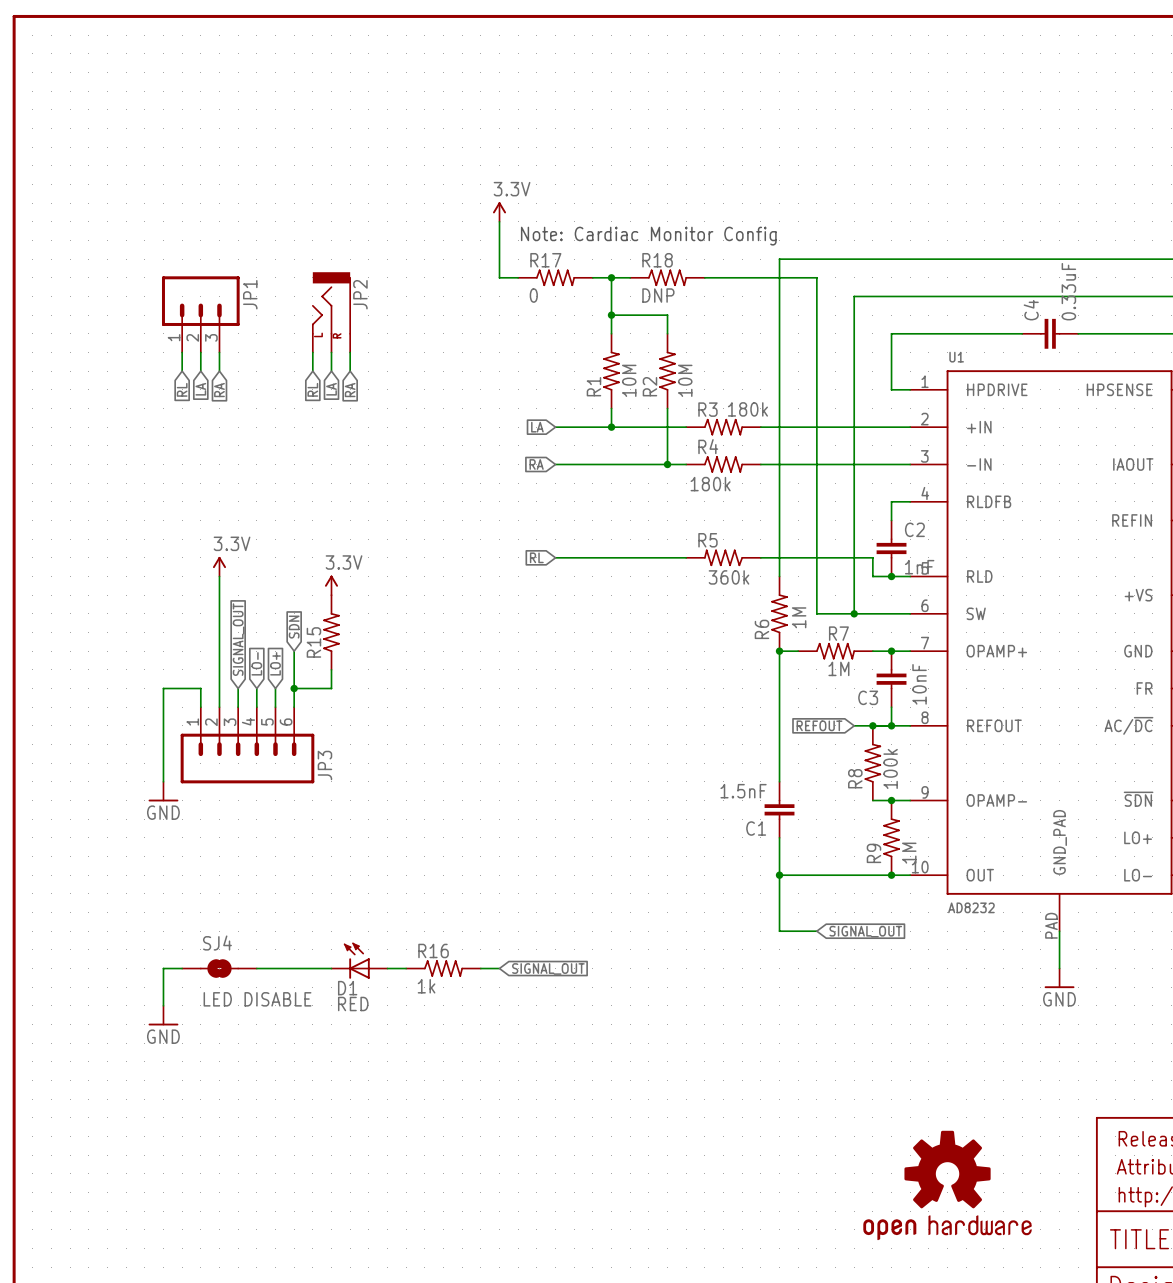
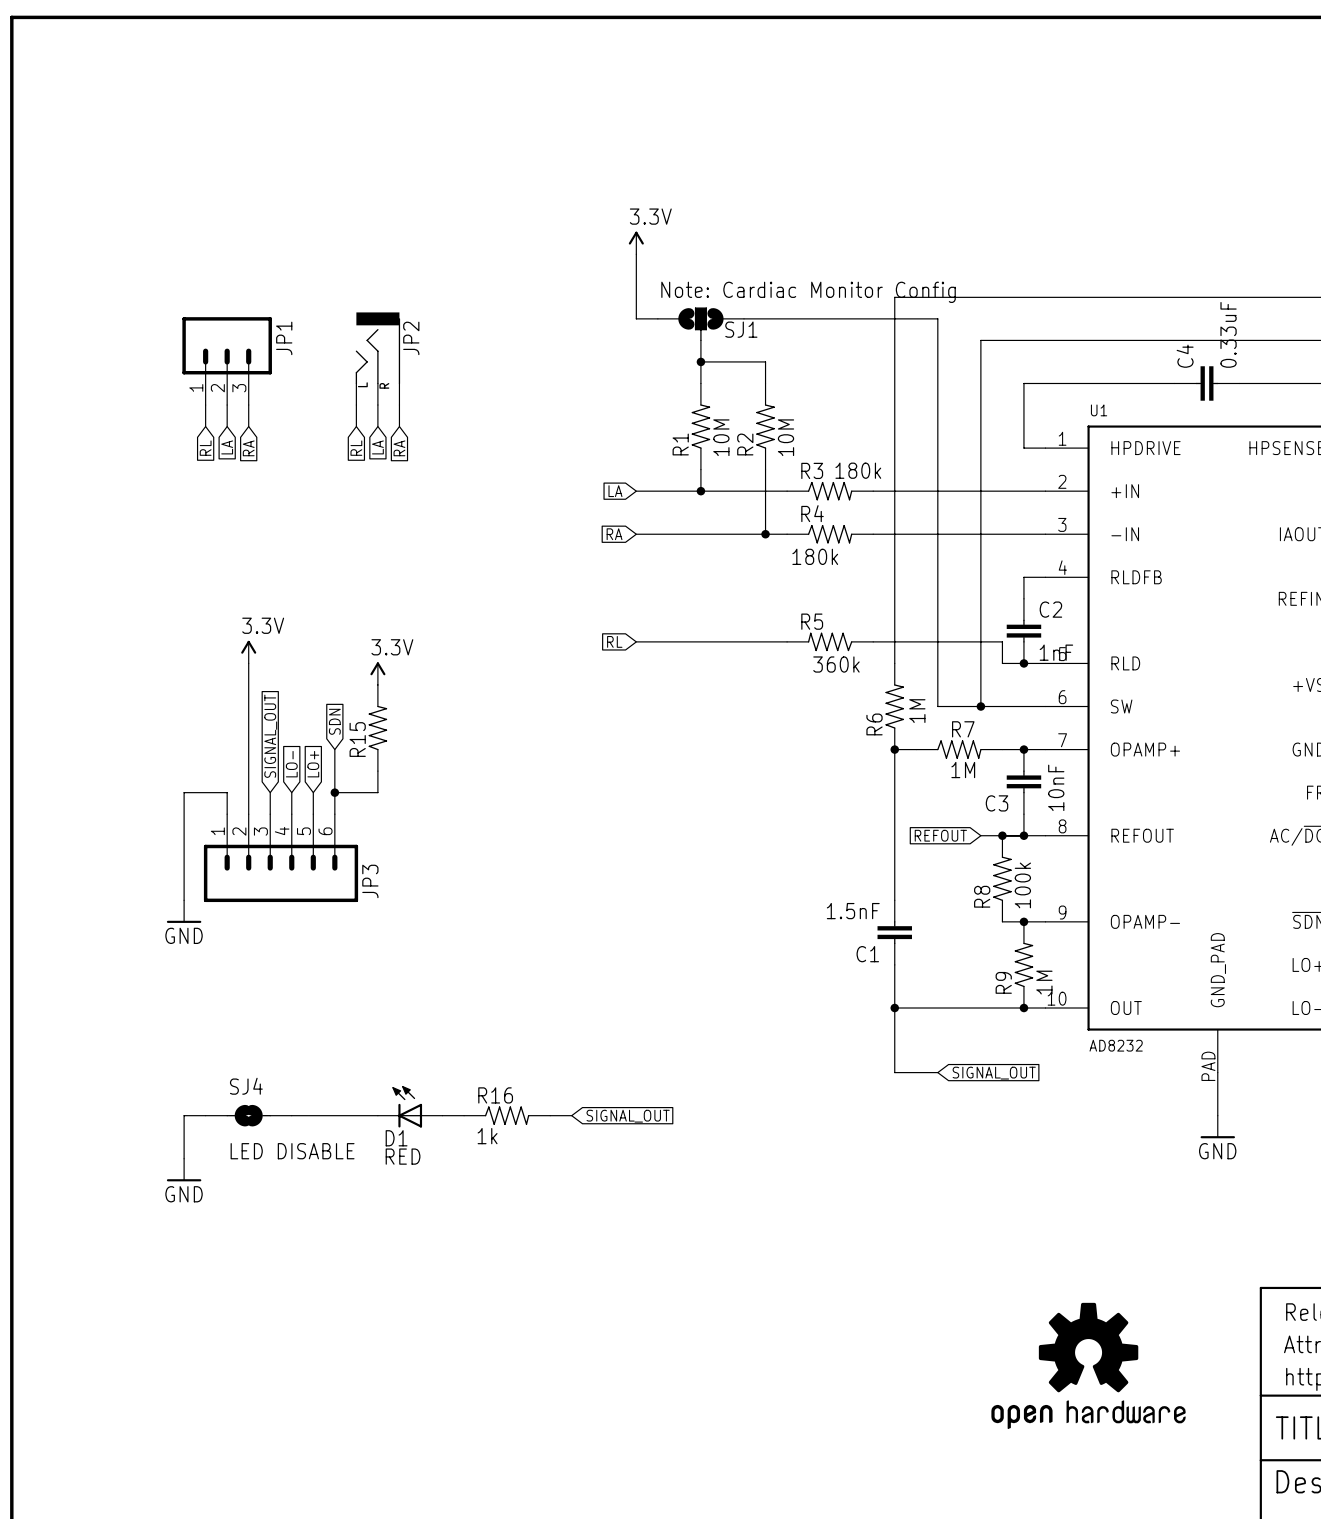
power symbol position: 3.3V (499, 212) -> 3.3V (636, 242)
wire: (499, 221) (499, 277) (518, 277) -> (636, 254) (636, 318) (657, 318)
text position: Note: Cardiac Monitor Config (648, 236) -> Note: Cardiac Monitor Config (808, 292)
R17: 0 (555, 277) -> none
junction: (611, 277) -> none
wire: none -> (744, 318) (808, 318)
R18: DNP (667, 277) -> none
SJ1: none -> (700, 334)

